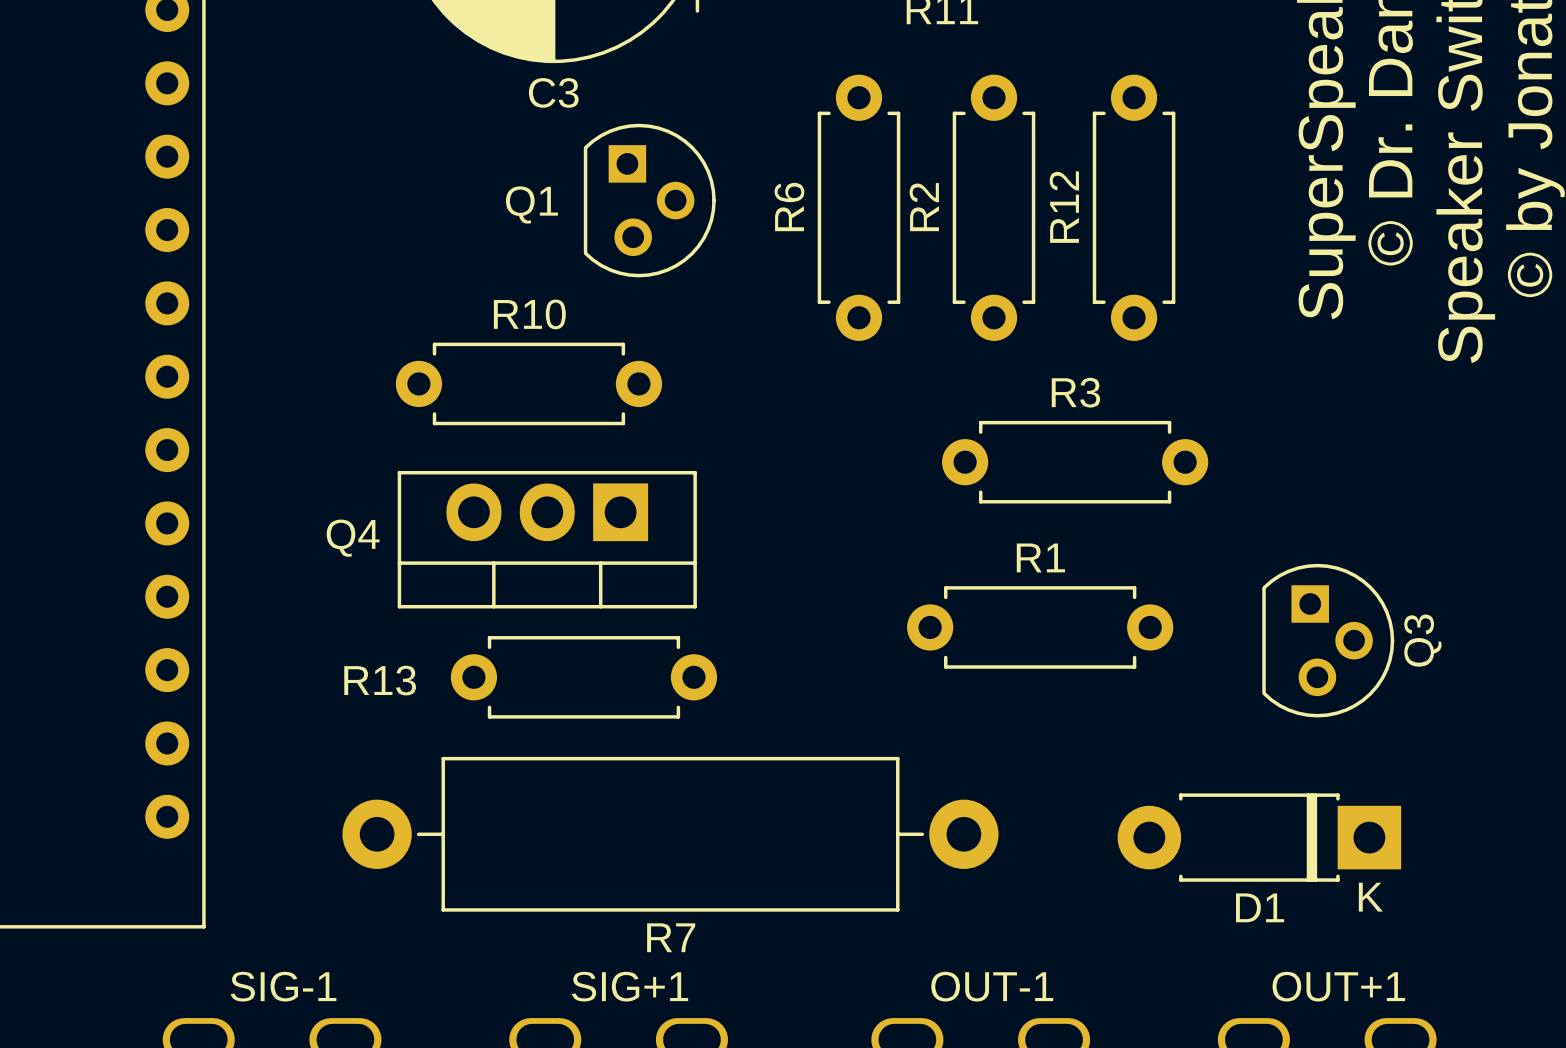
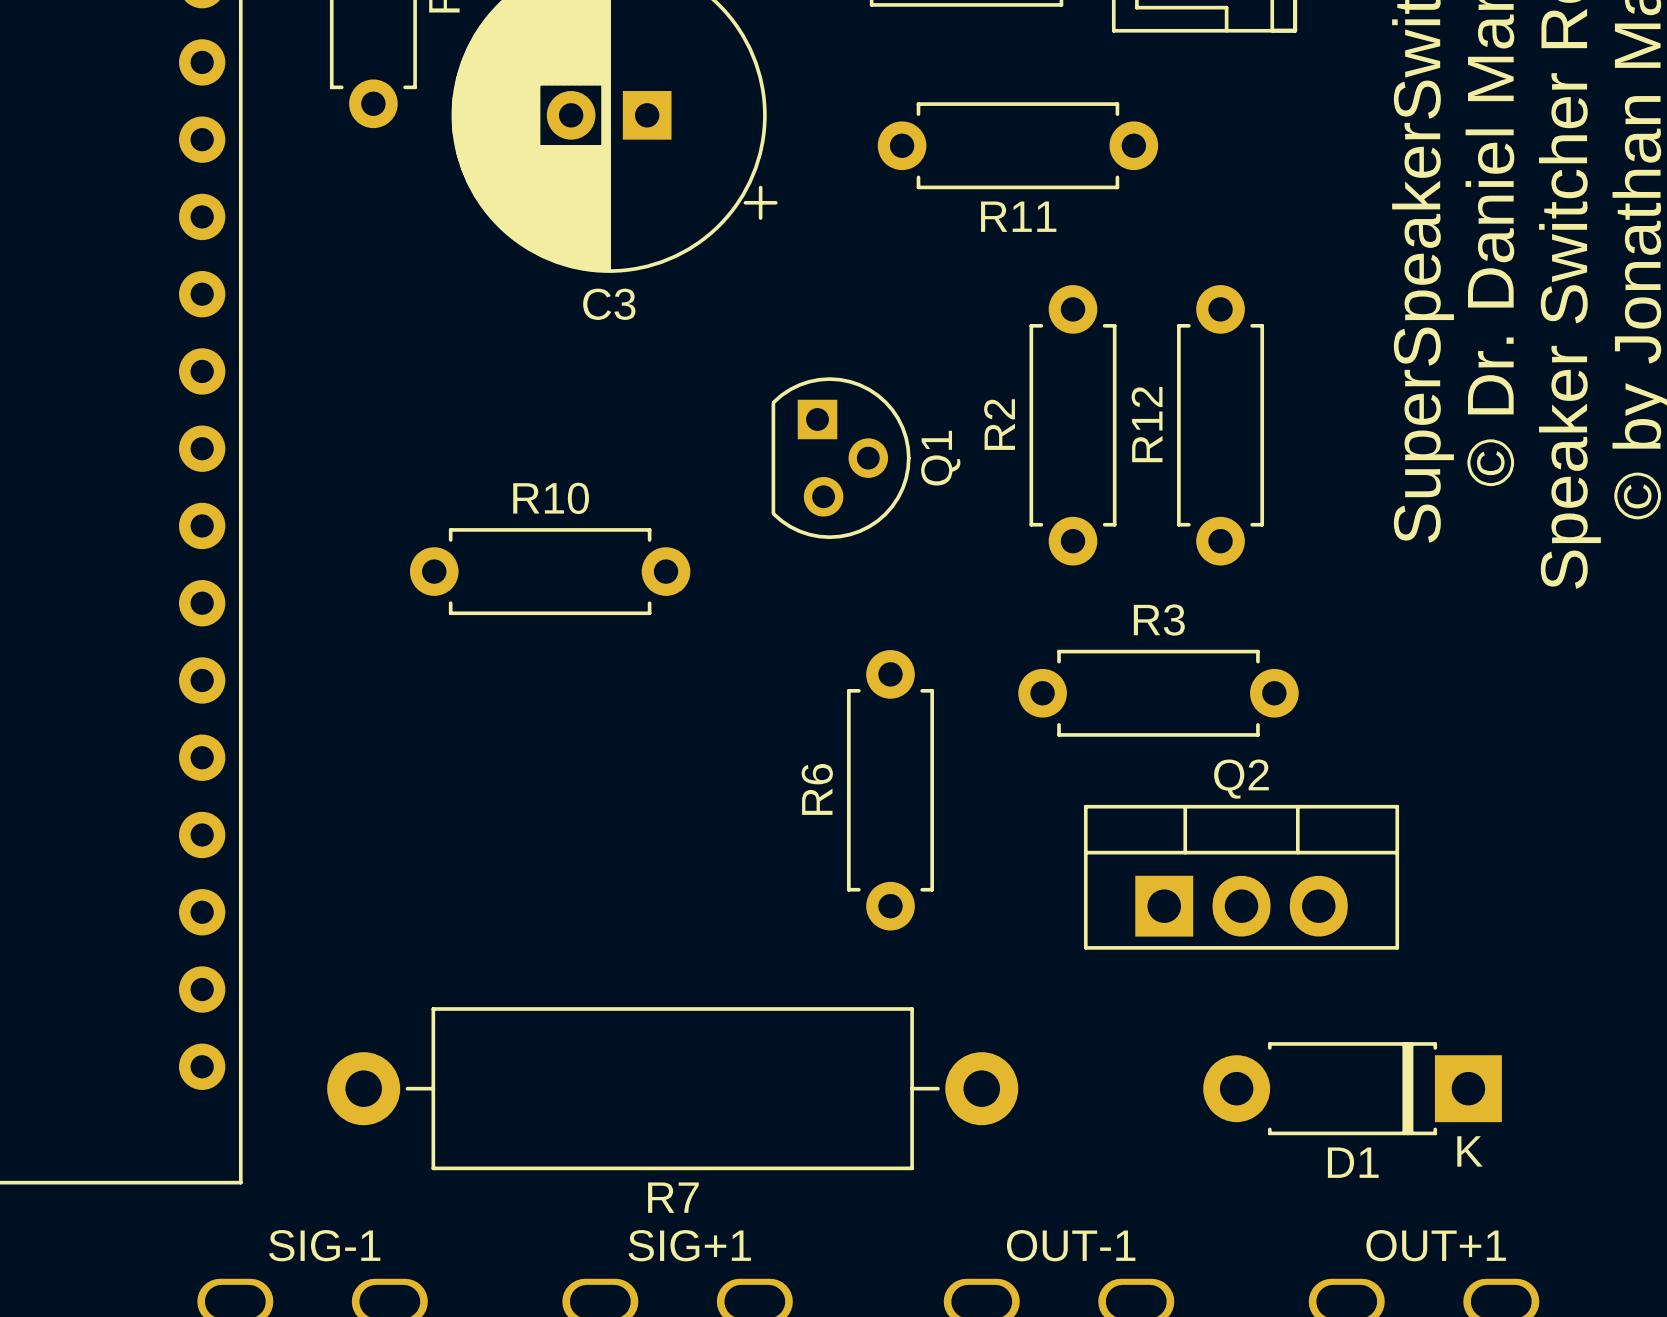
Q1 position: (649, 200) -> (841, 458)
Q1 name rotation: 0° (531, 204) -> 90° counterclockwise (940, 458)
Q1 name position: Q1 (531, 204) -> Q1 (940, 458)
R6 position: (859, 207) -> (890, 790)
R10 position: (528, 383) -> (550, 571)
Q4: (547, 539) -> none
R1: (1040, 627) -> none
Q2: none -> (1241, 877)
Q3: (1328, 640) -> none
R13: (583, 677) -> none
R7 position: (670, 834) -> (672, 1088)

